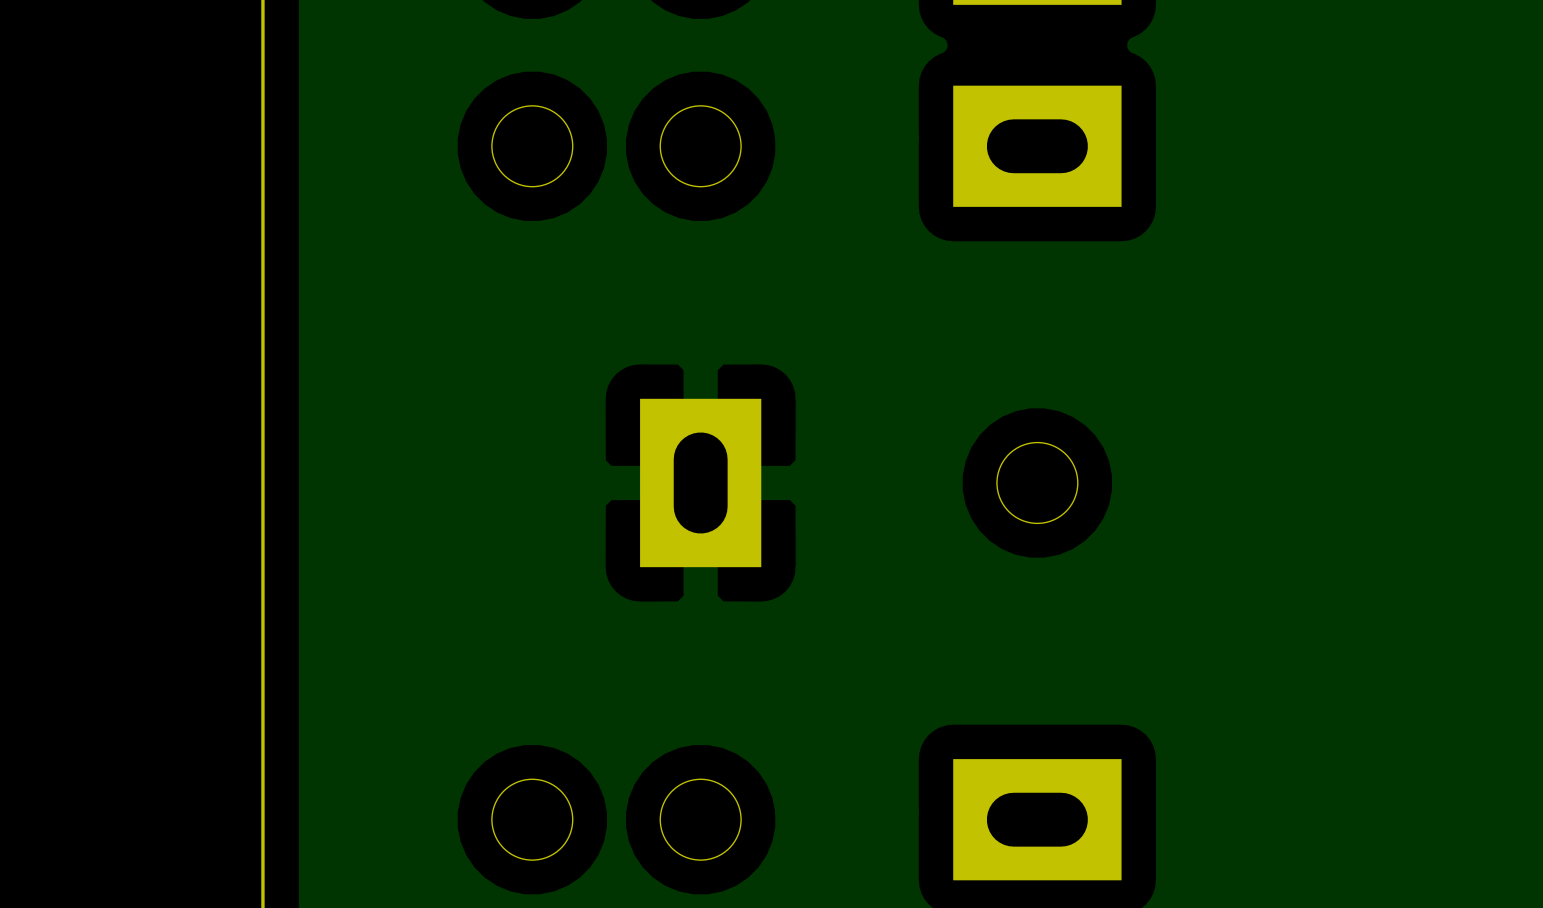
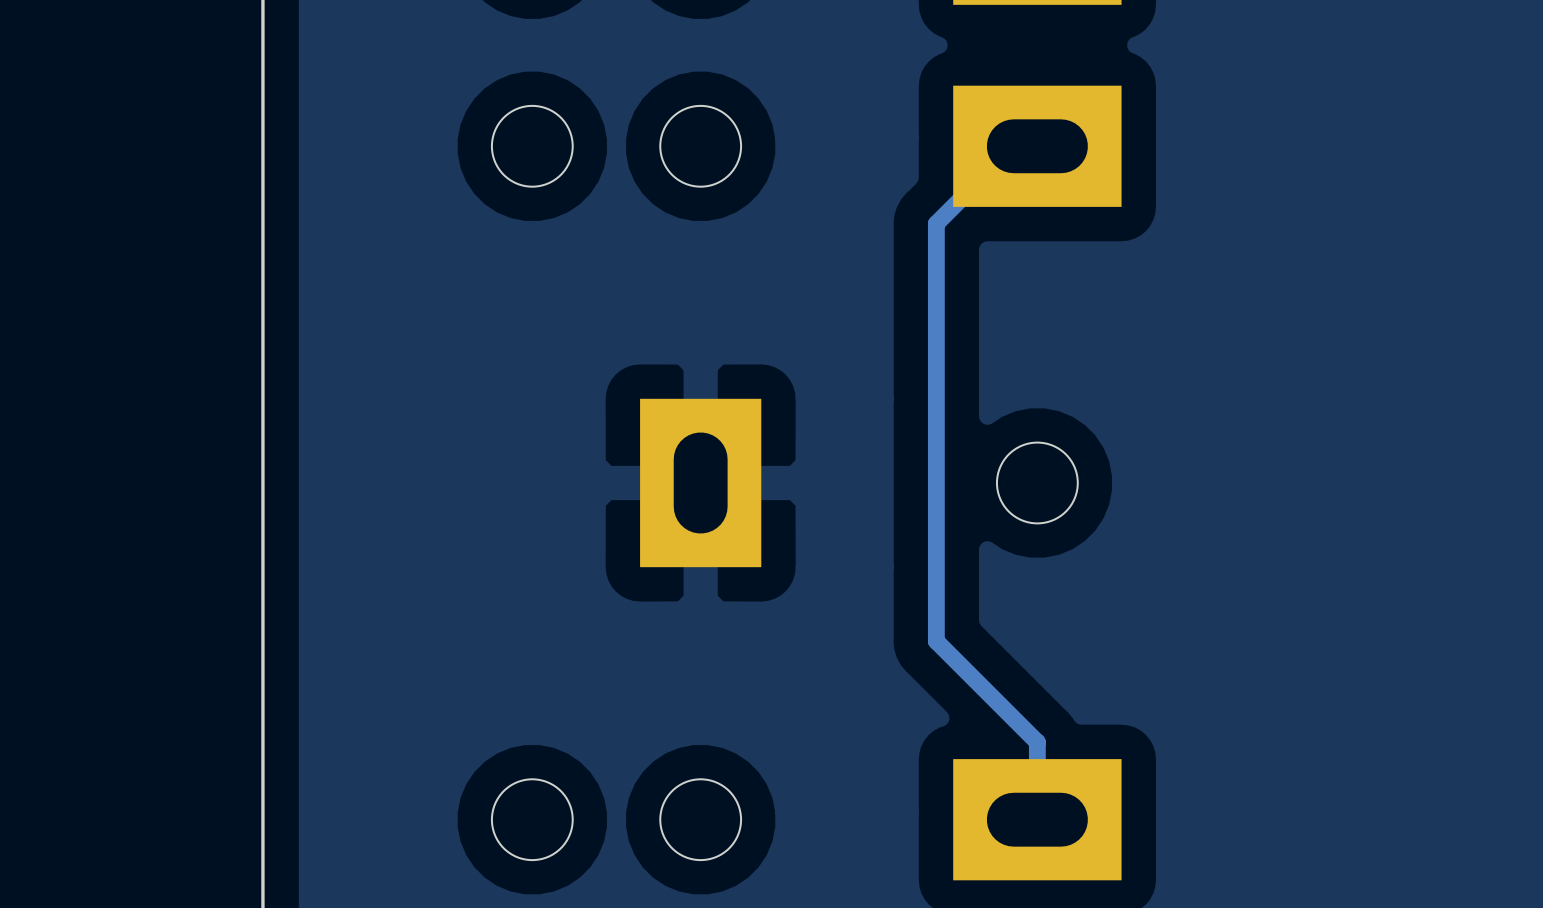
track: none -> (1037, 146) (1013, 146) (936, 223) (936, 641) (1037, 742) (1037, 819)

